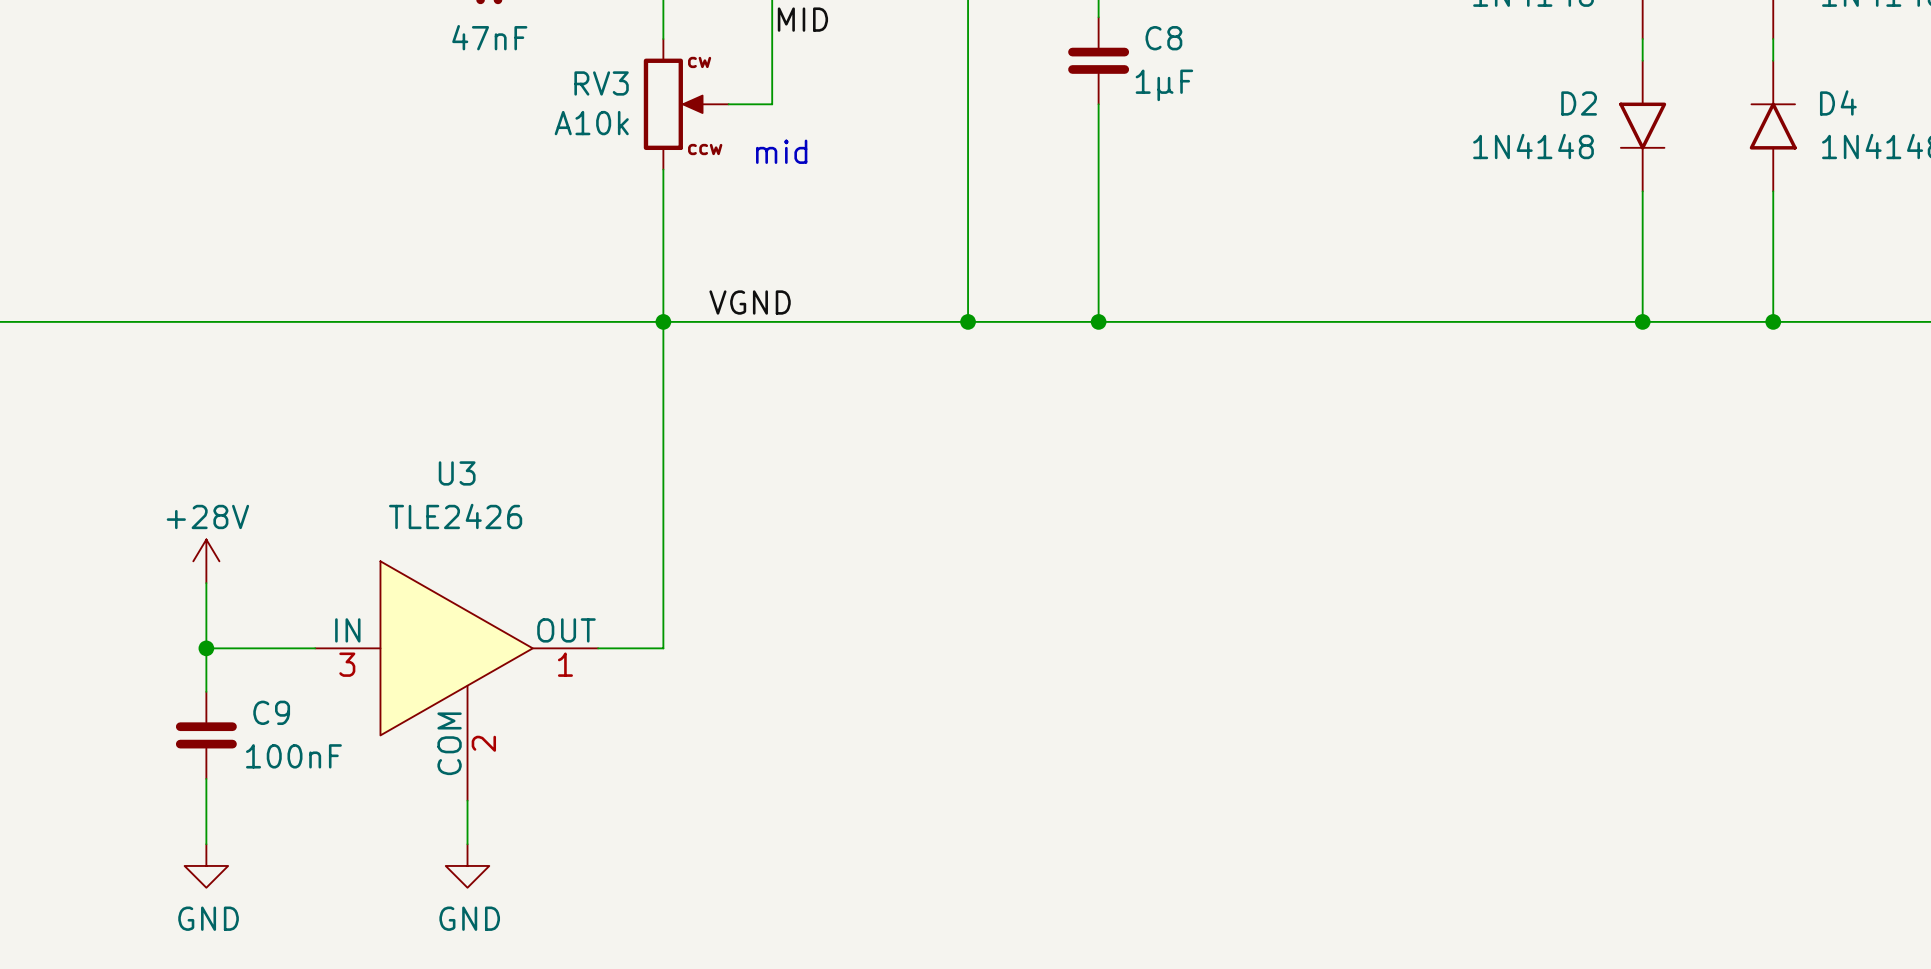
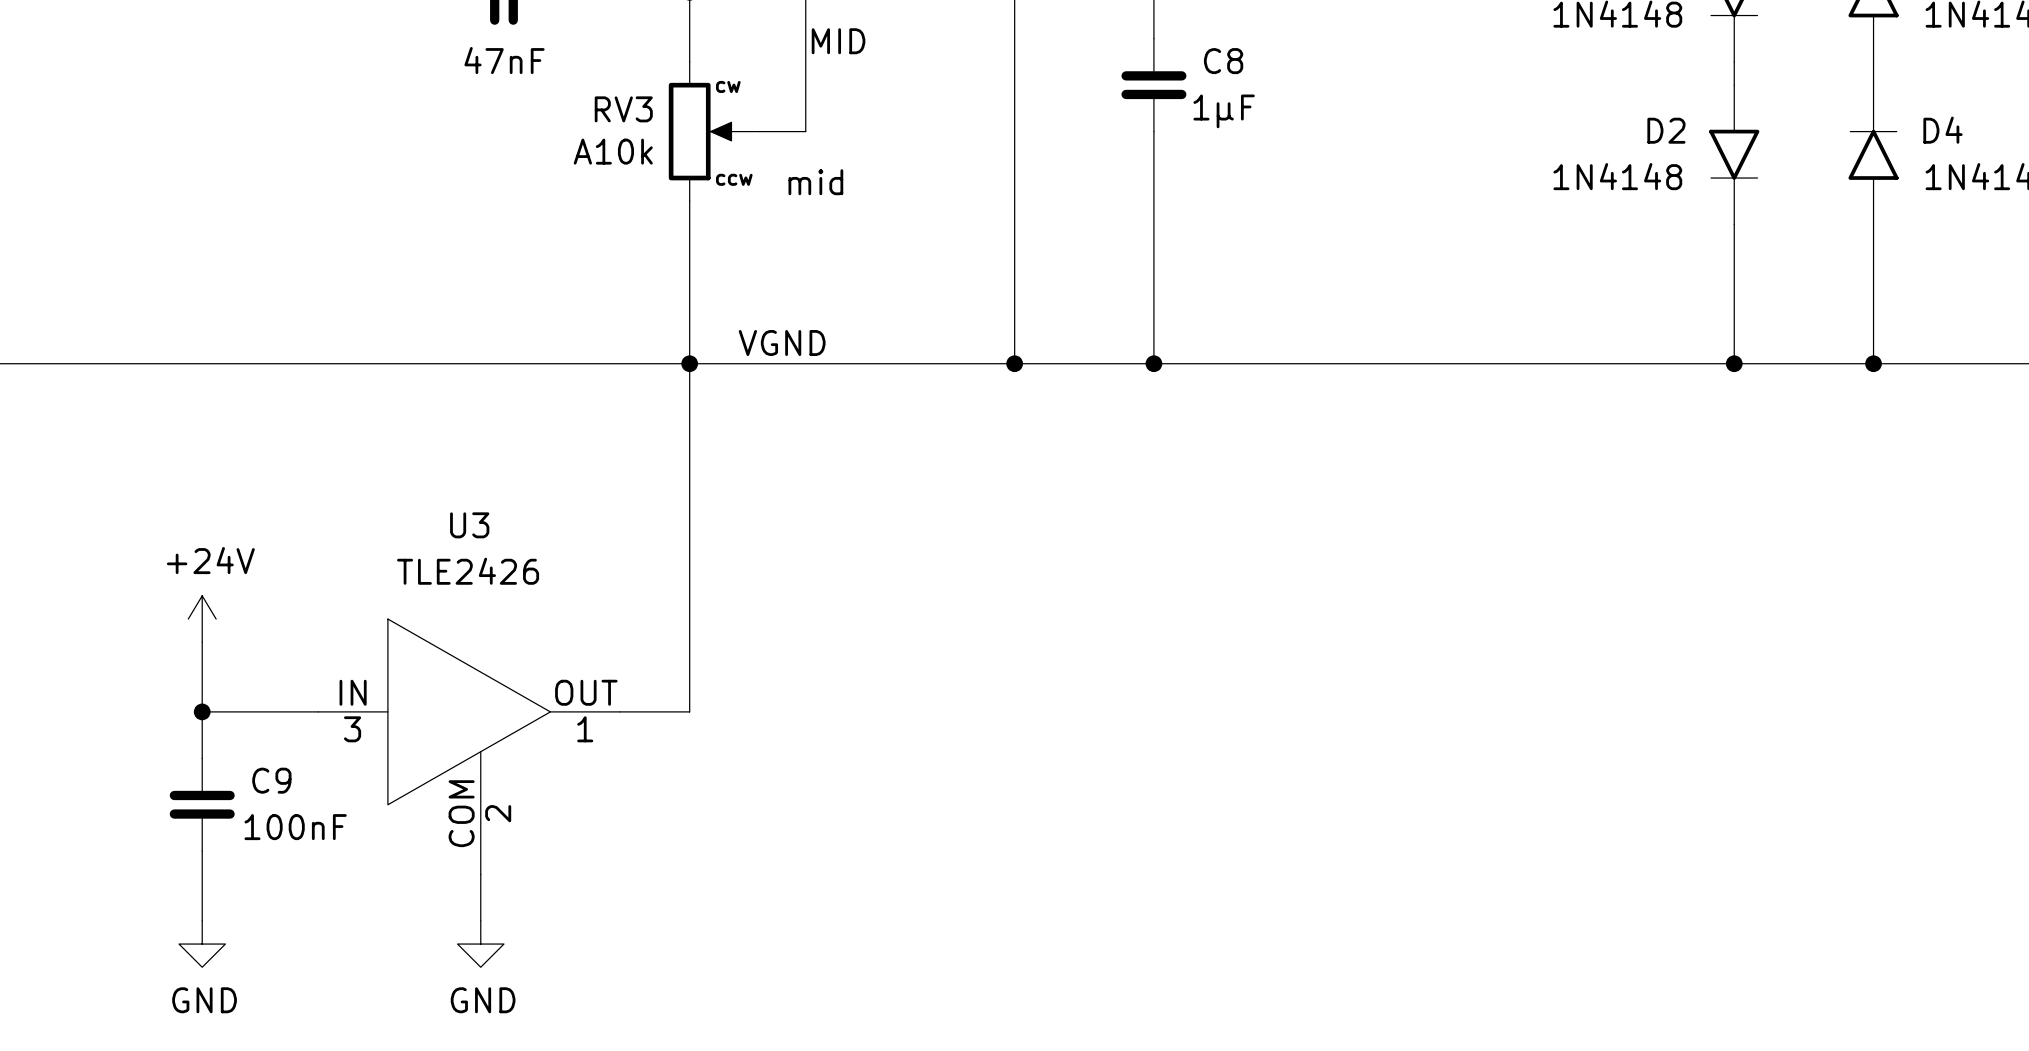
power symbol: +28V (206, 561) -> +24V (202, 619)

